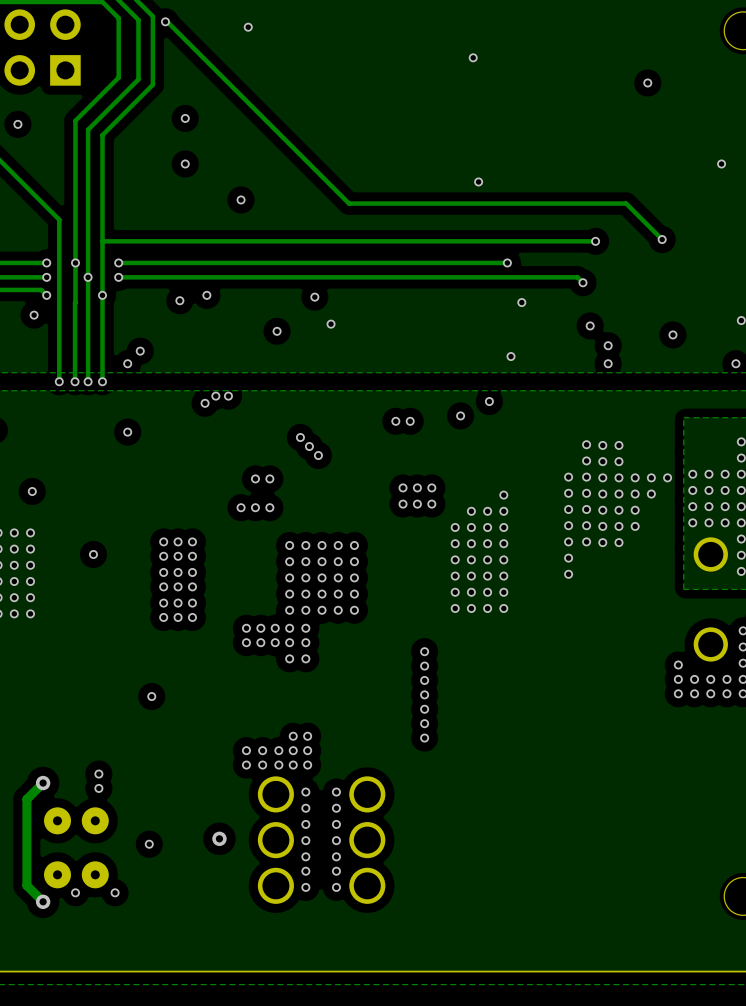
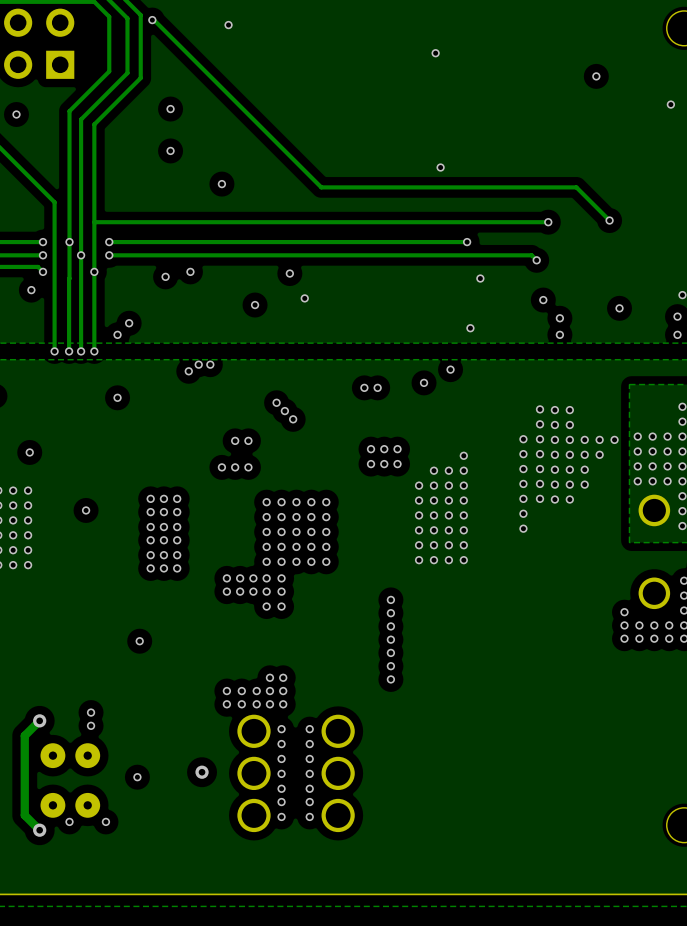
via position: (721, 163) -> (670, 104)
via: none -> (677, 316)

